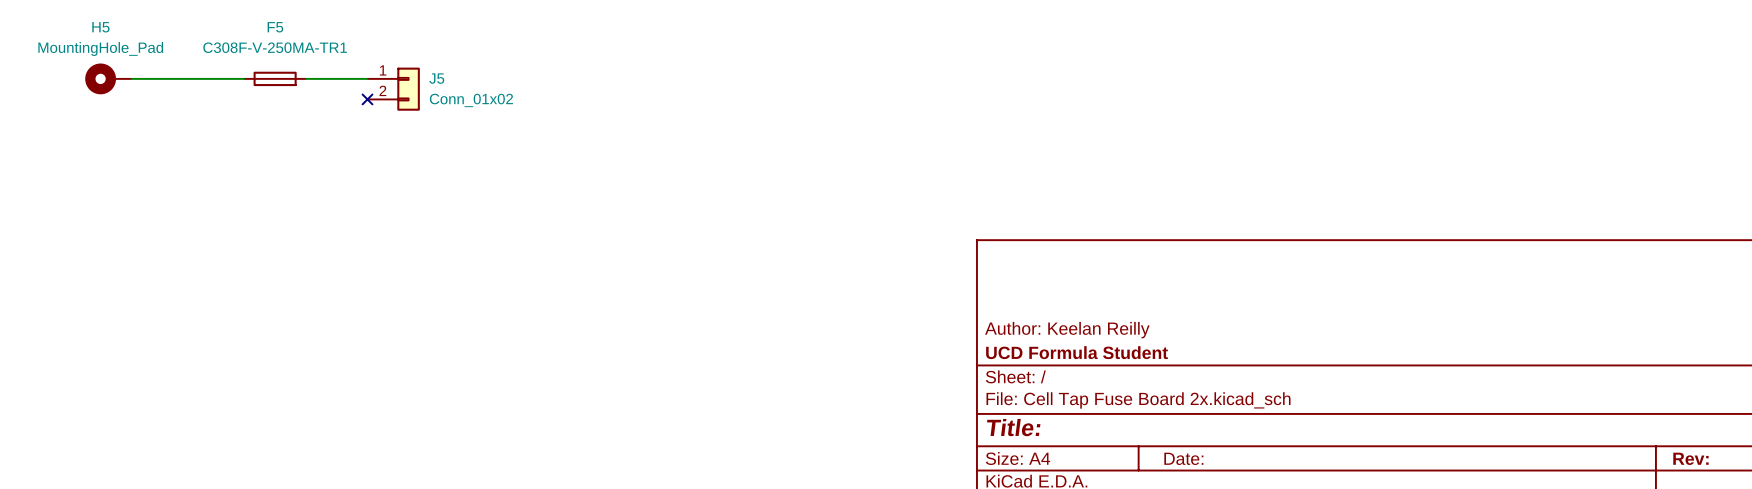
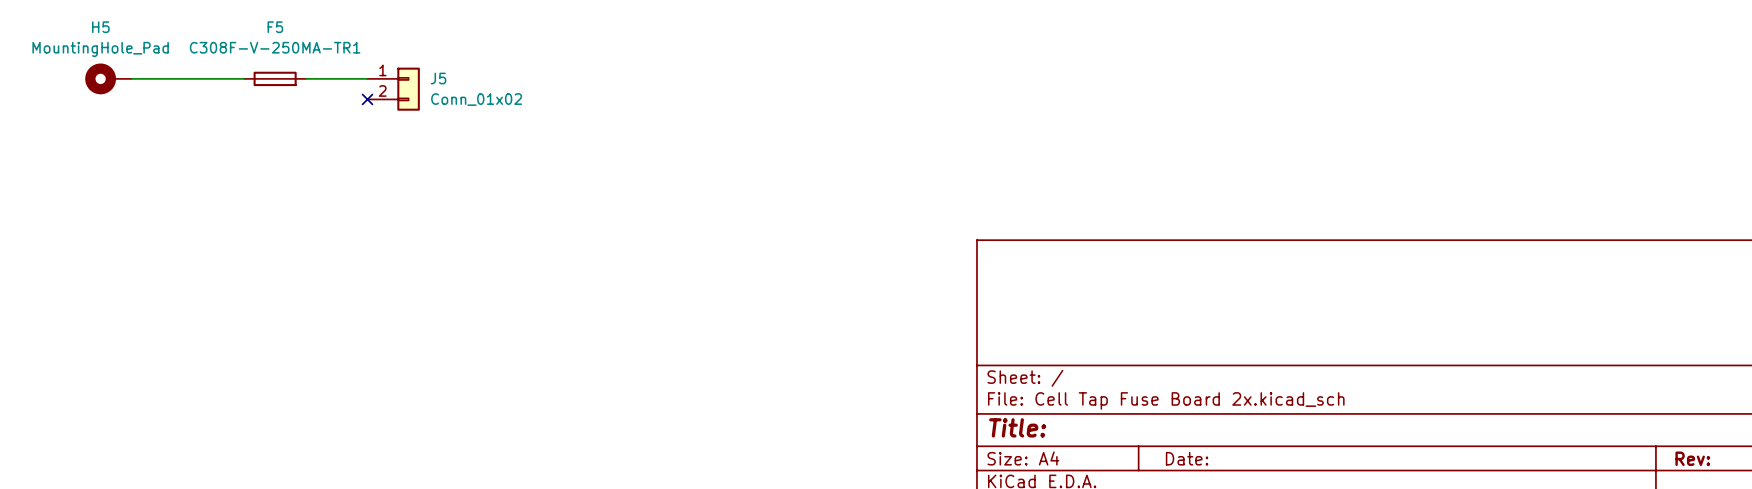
title block: Author: Keelan Reilly (1067, 330) -> none
title block: UCD Formula Student (1077, 352) -> none

